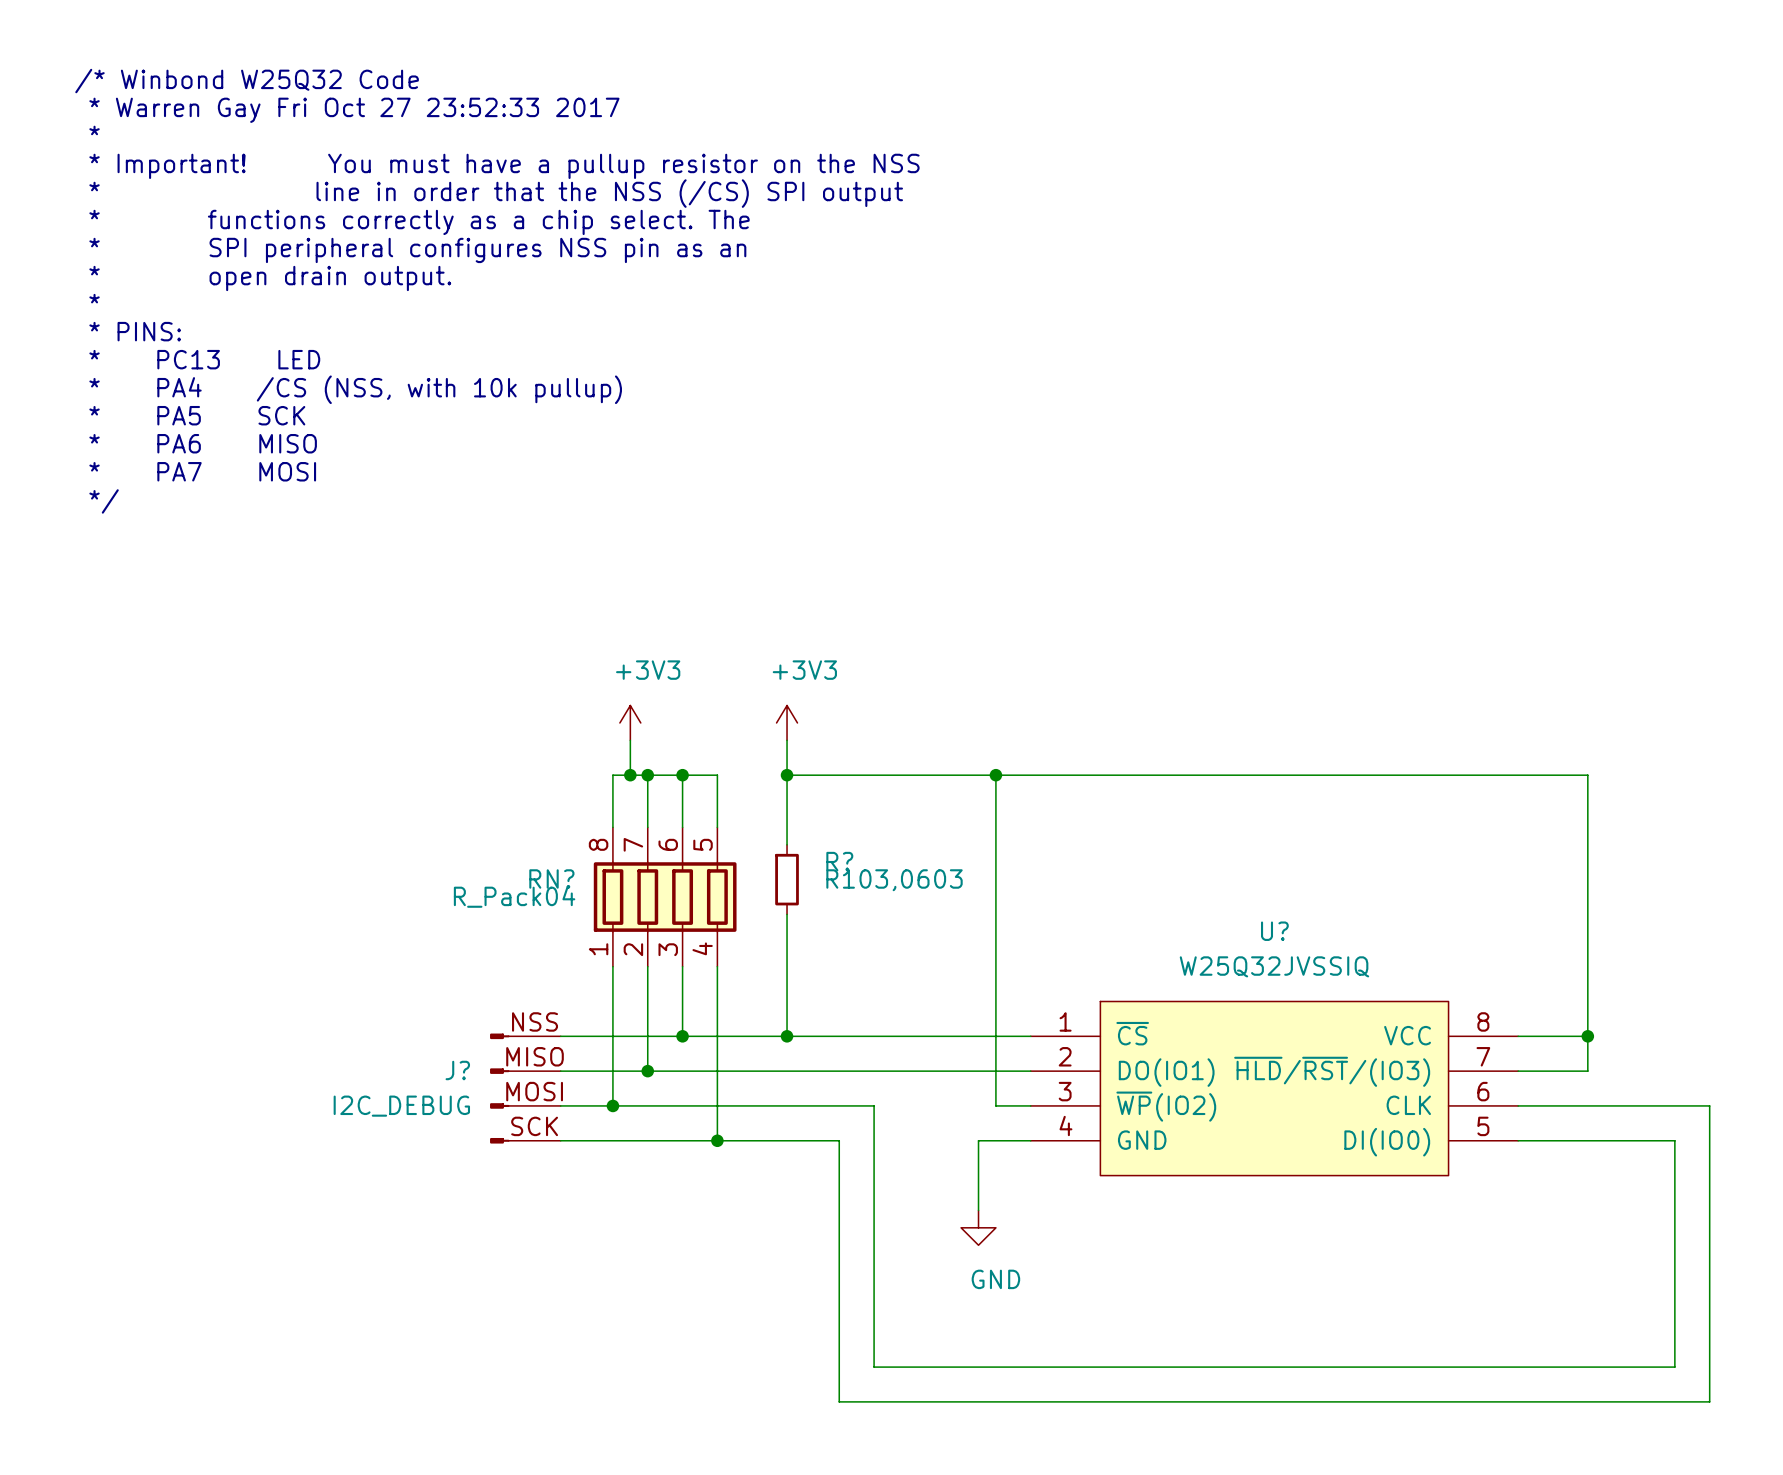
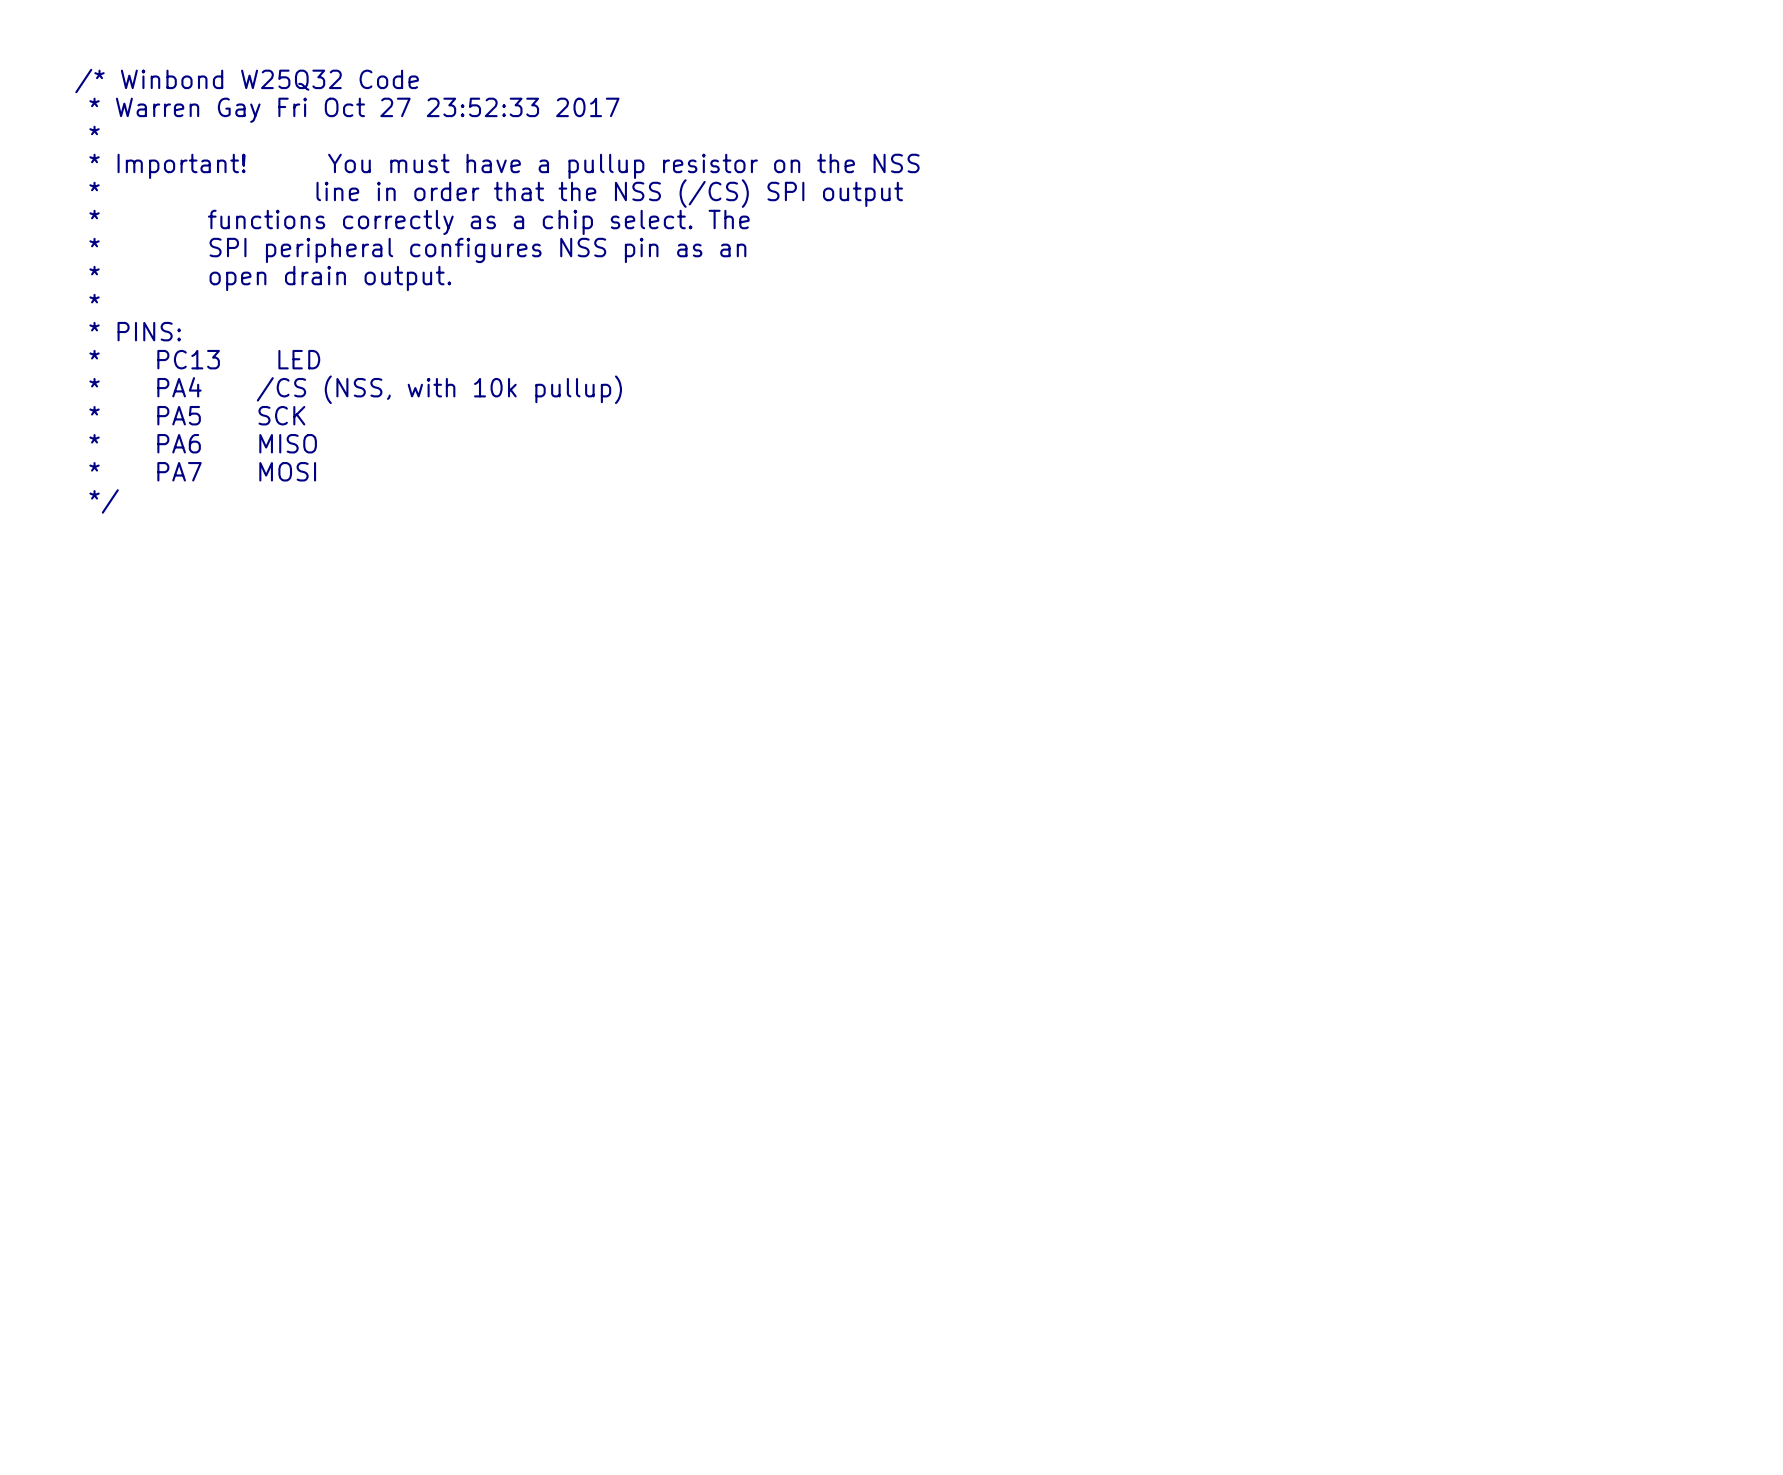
power symbol: +3V3 (630, 722) -> none
power symbol: +3V3 (787, 722) -> none
wire: (630, 740) (630, 775) -> none
wire: (787, 740) (787, 844) -> none
junction: (630, 775) -> none
wire: (647, 775) (647, 827) -> none
junction: (647, 775) -> none
wire: (682, 775) (682, 827) -> none
junction: (682, 775) -> none
wire: (787, 775) (1587, 775) (1587, 1071) (1518, 1071) -> none
junction: (787, 775) -> none
wire: (995, 775) (995, 1105) (1030, 1105) -> none
junction: (995, 775) -> none
wire: (612, 827) (612, 775) (717, 775) (717, 827) -> none
R?: R103,0603 (787, 879) -> none
RN?: R_Pack04 (665, 897) -> none
wire: (787, 914) (787, 1036) -> none
wire: (612, 966) (612, 1105) -> none
wire: (647, 966) (647, 1071) -> none
wire: (682, 966) (682, 1036) -> none
wire: (717, 966) (717, 1140) -> none
wire: (560, 1036) (1030, 1036) -> none
junction: (682, 1036) -> none
junction: (787, 1036) -> none
wire: (1518, 1036) (1587, 1036) -> none
junction: (1587, 1036) -> none
wire: (560, 1071) (1030, 1071) -> none
junction: (647, 1071) -> none
J?: I2C_DEBUG (525, 1088) -> none
U?: W25Q32JVSSIQ (1274, 1088) -> none
wire: (560, 1105) (874, 1105) (874, 1367) (1674, 1367) (1674, 1140) (1518, 1140) -> none
junction: (612, 1105) -> none
wire: (1518, 1105) (1709, 1105) (1709, 1401) (839, 1401) (839, 1140) (560, 1140) -> none
junction: (717, 1140) -> none
wire: (1030, 1140) (978, 1140) (978, 1210) -> none
power symbol: GND (978, 1227) -> none

